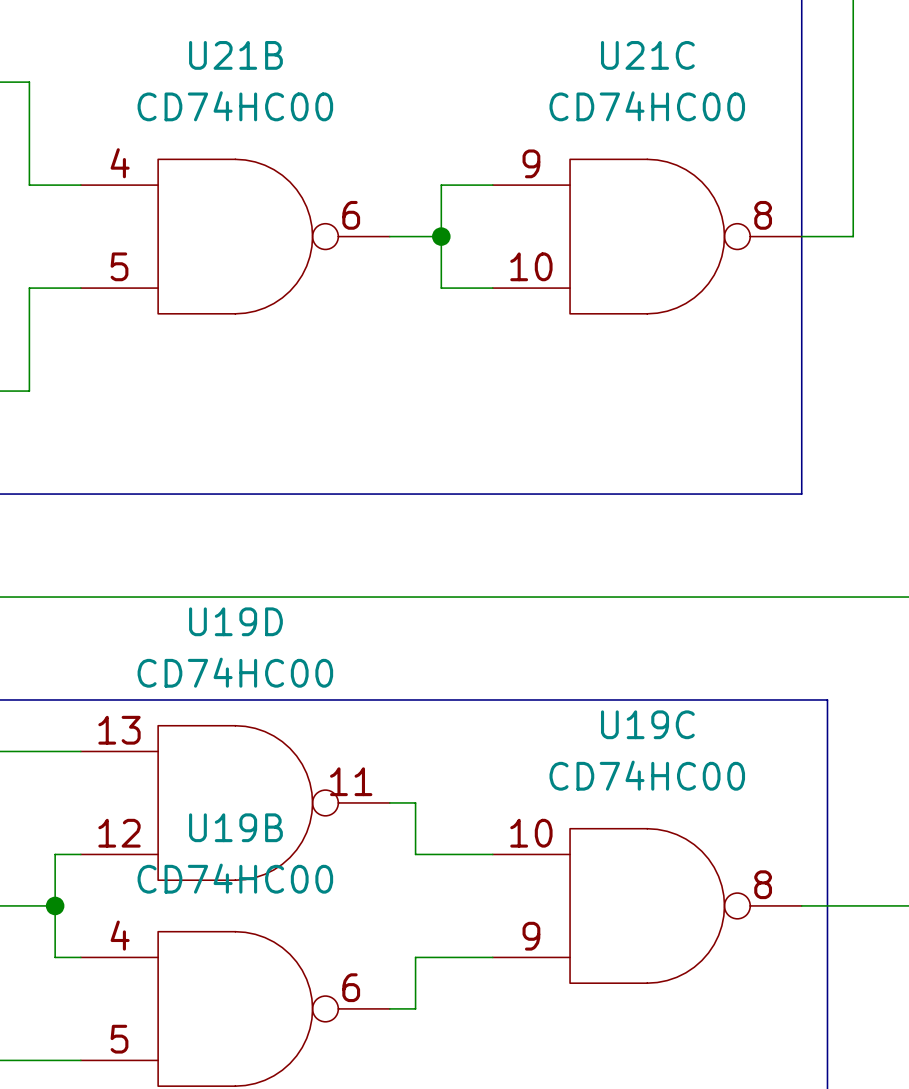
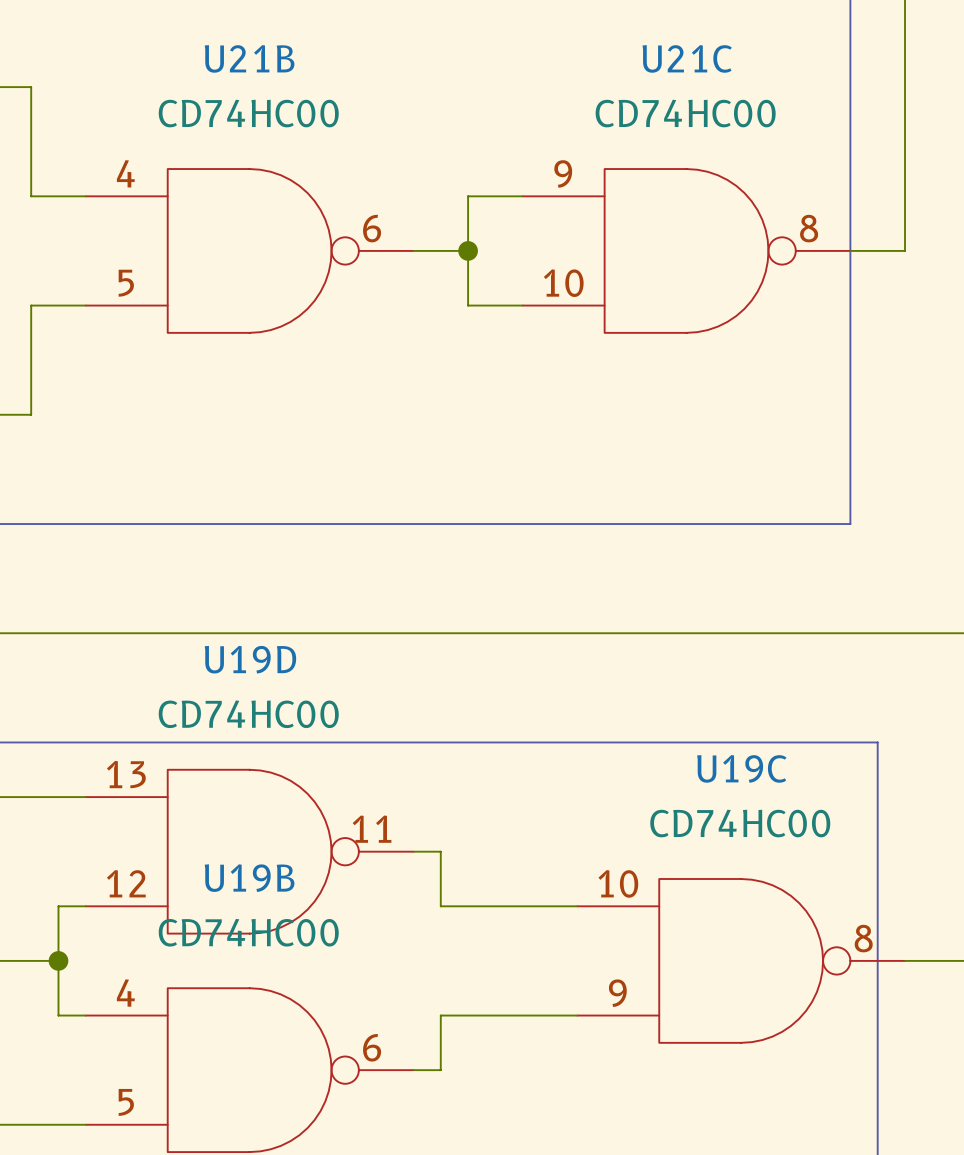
U19C position: (647, 905) -> (741, 960)

